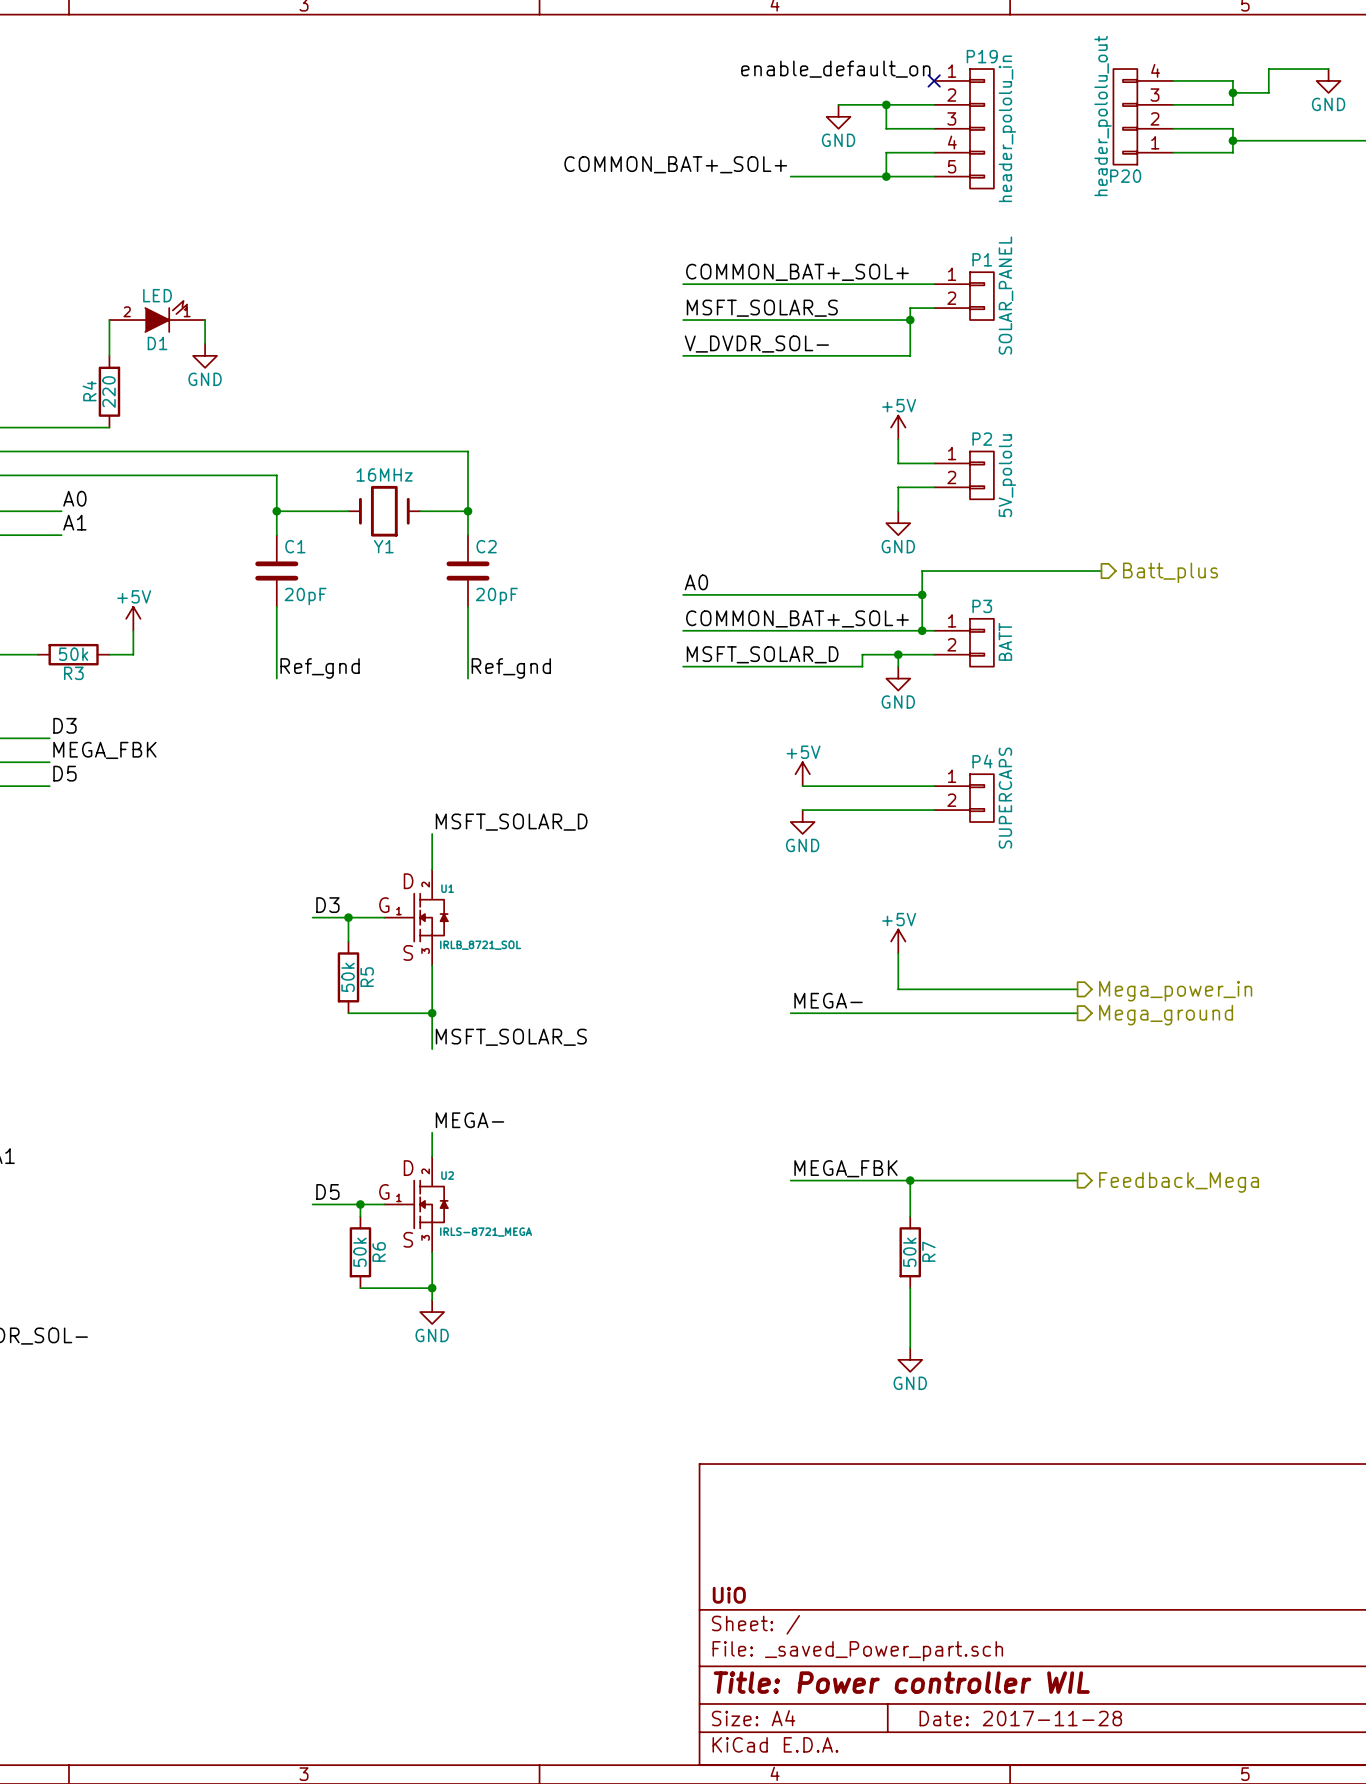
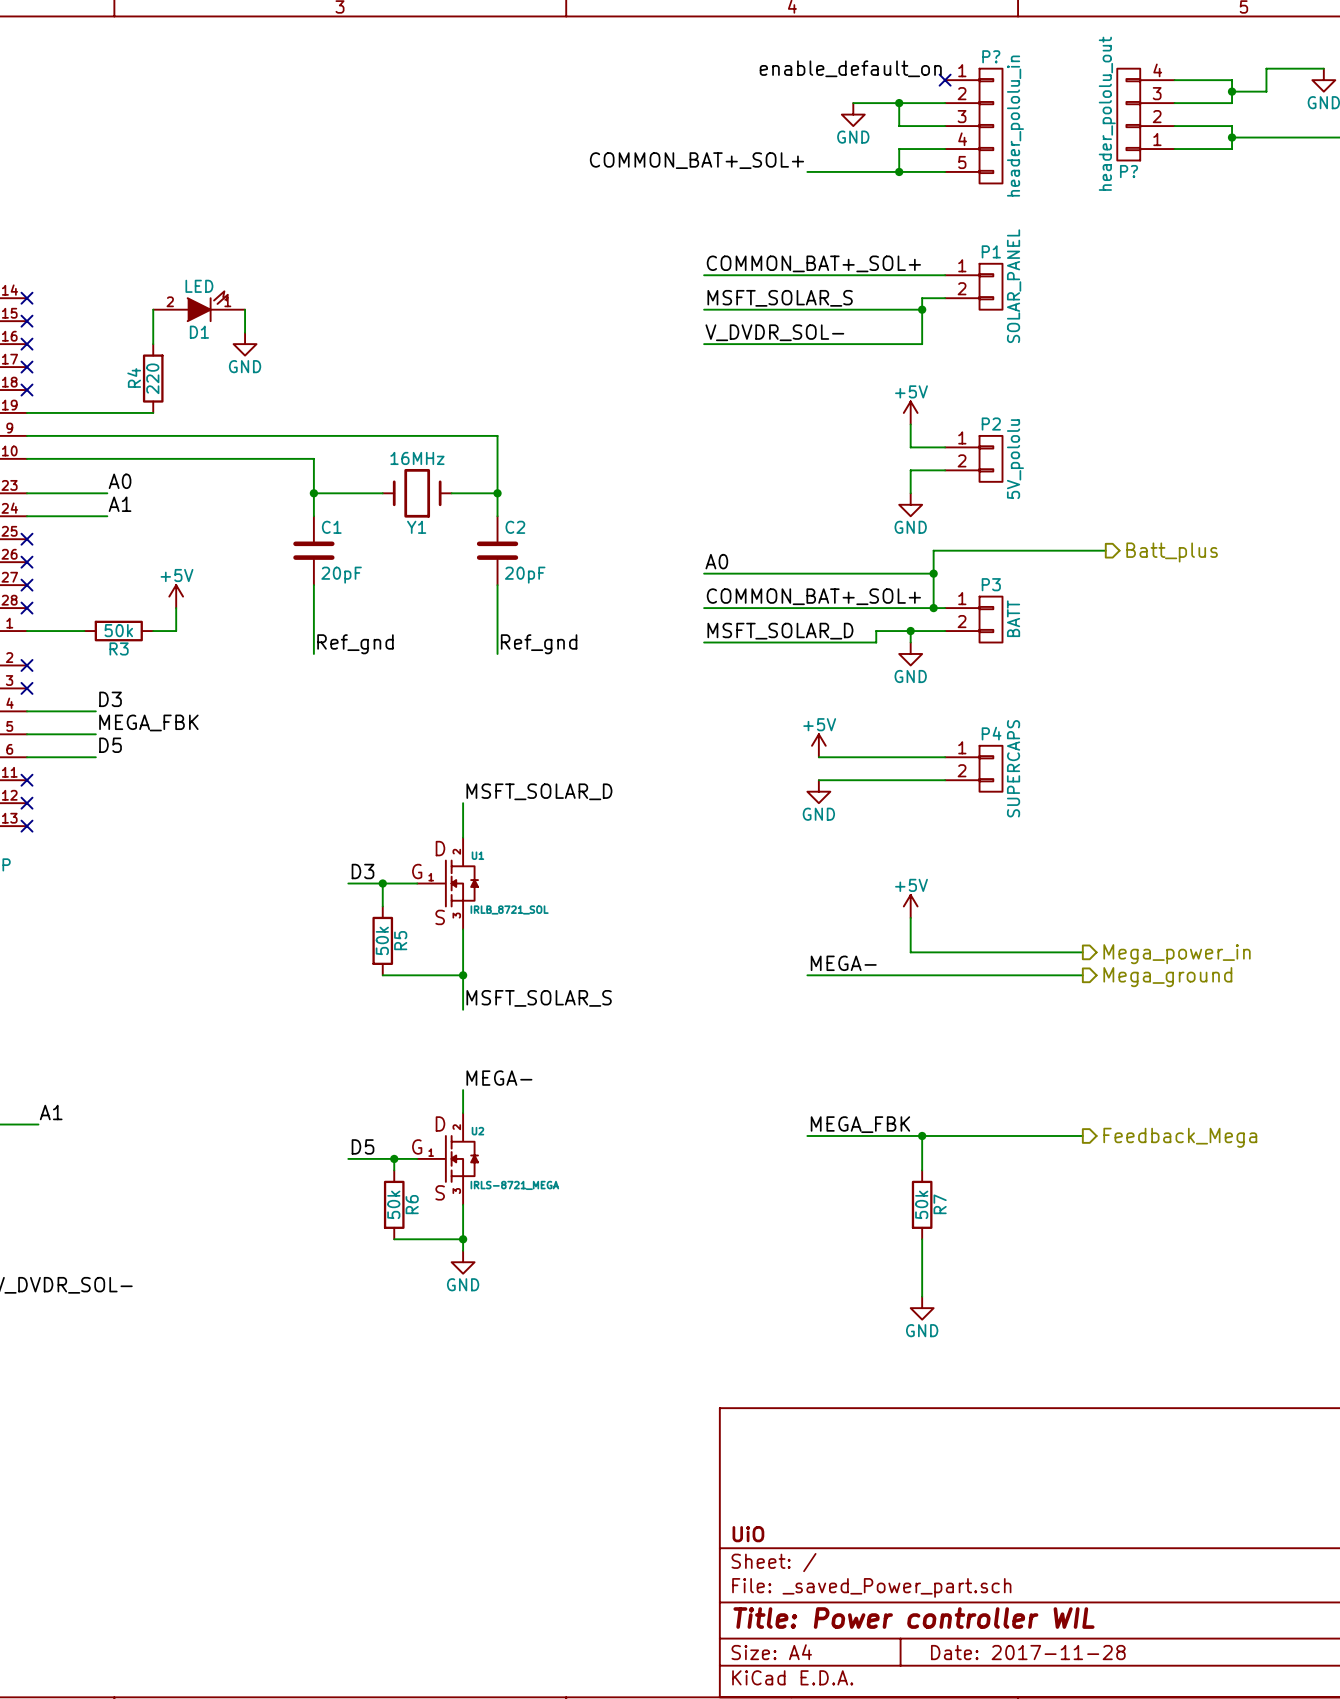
P19 name: P19 (982, 56) -> P? (991, 56)
P20 name: P20 (1125, 176) -> P? (1129, 171)

